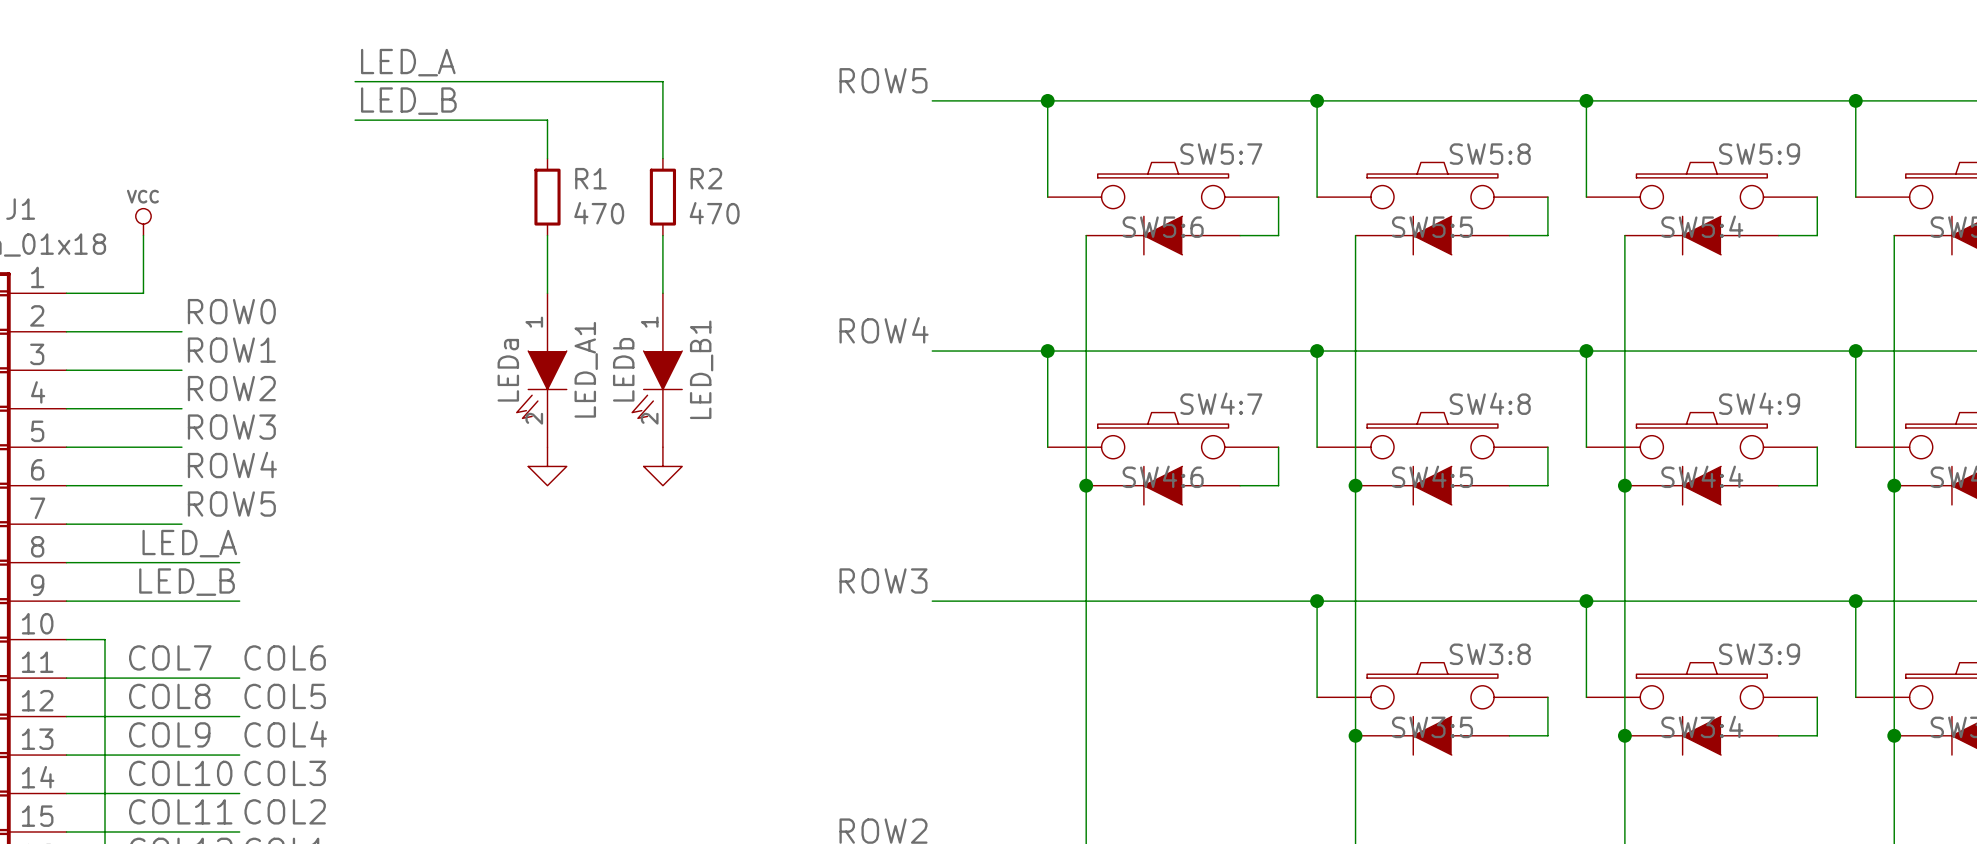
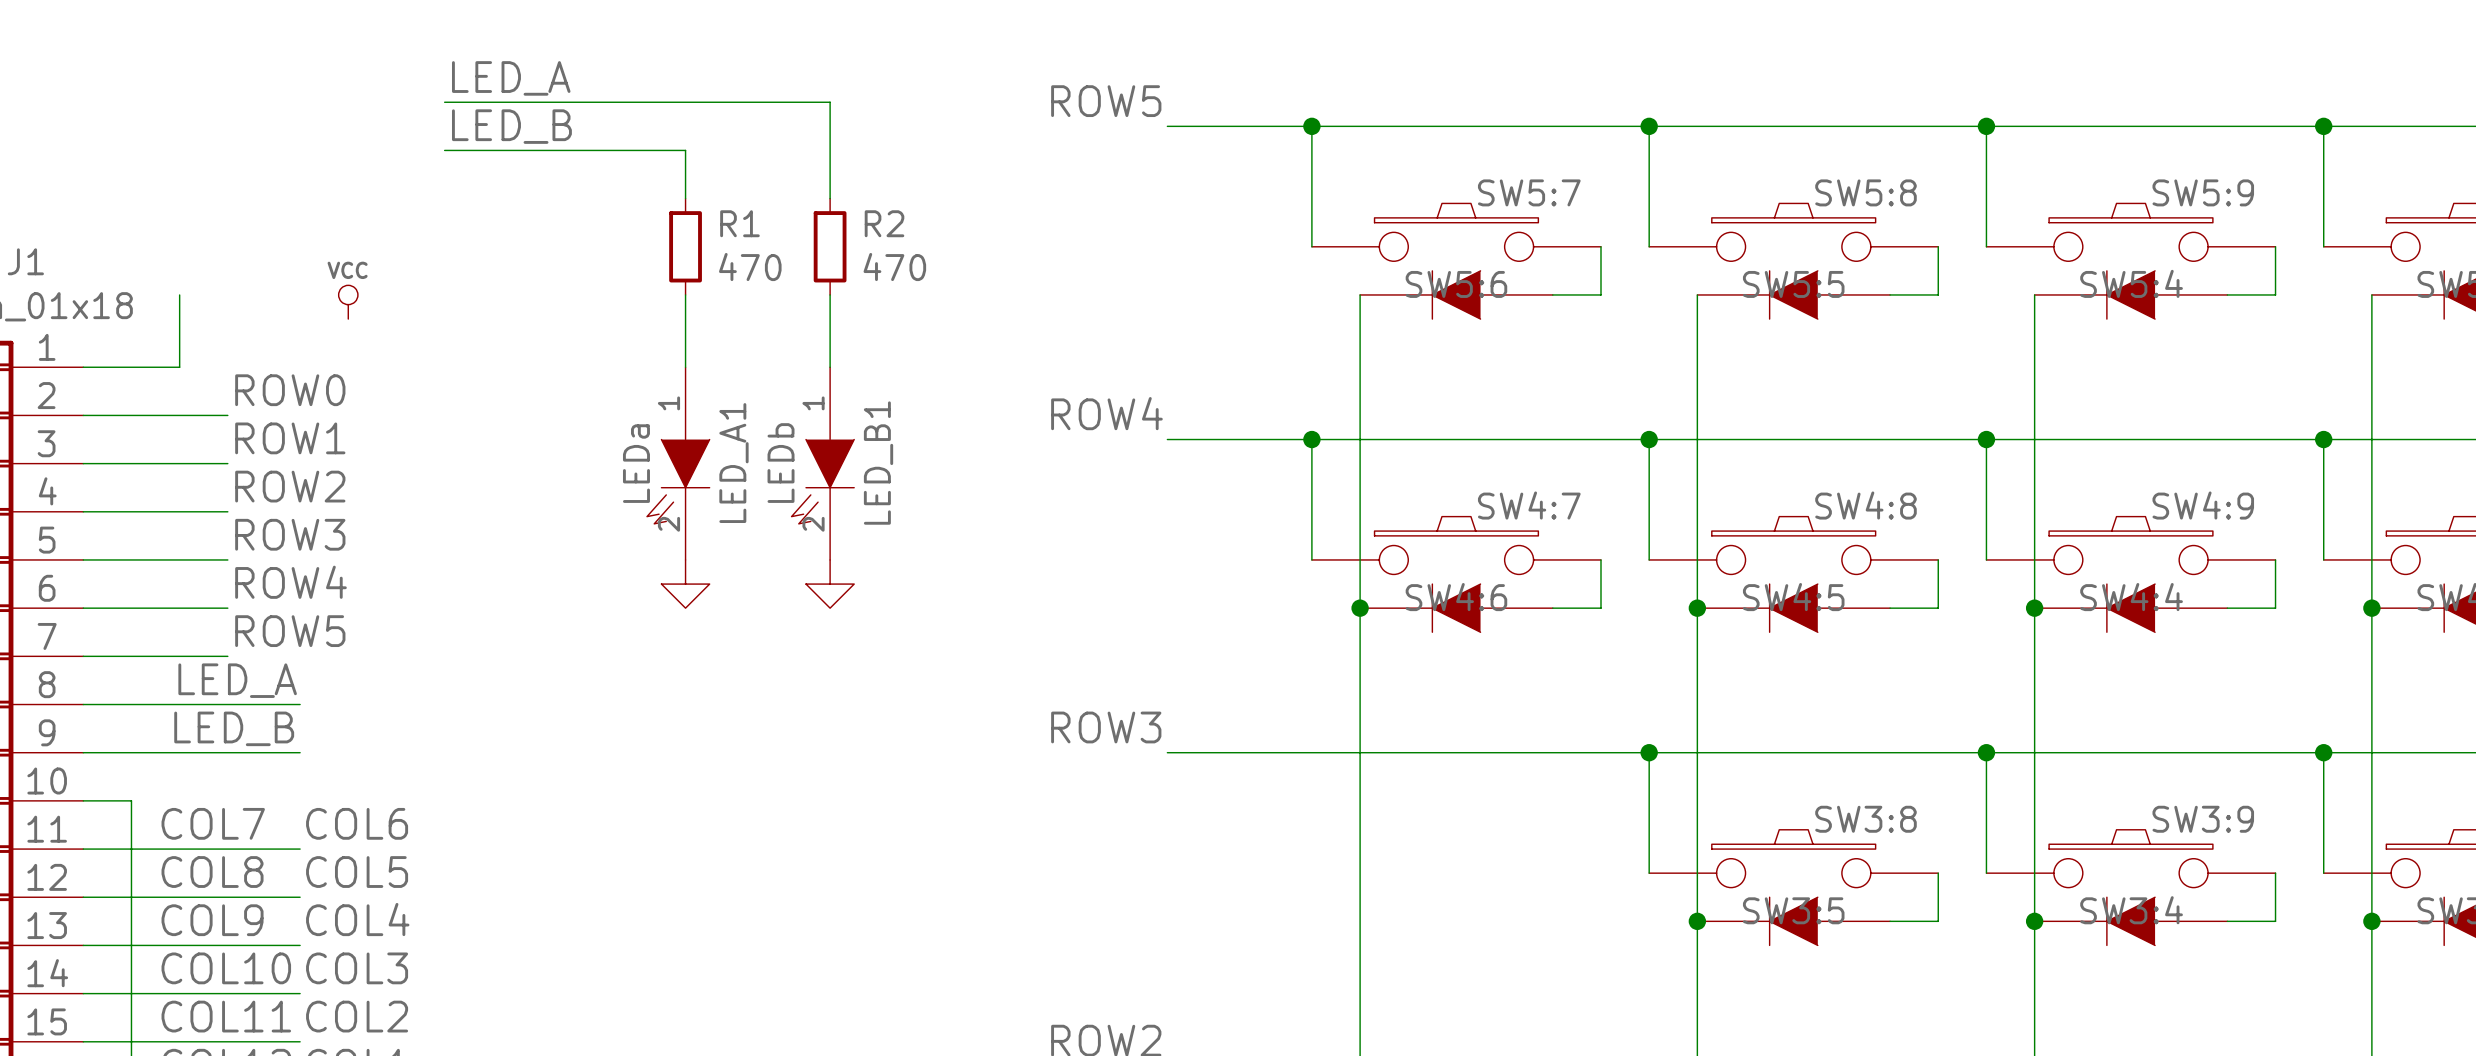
power symbol position: VCC (143, 222) -> VCC (348, 302)

